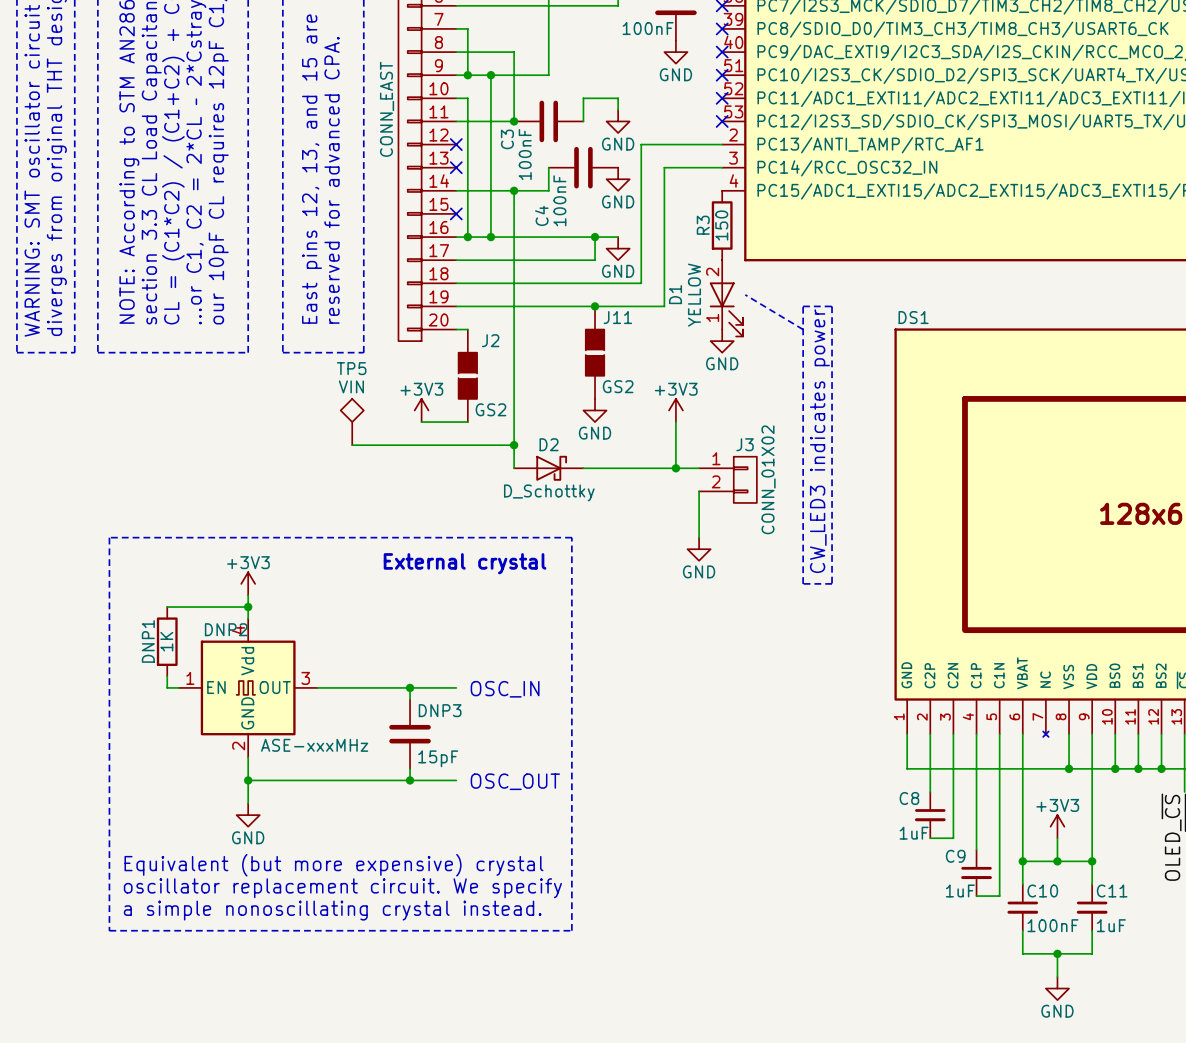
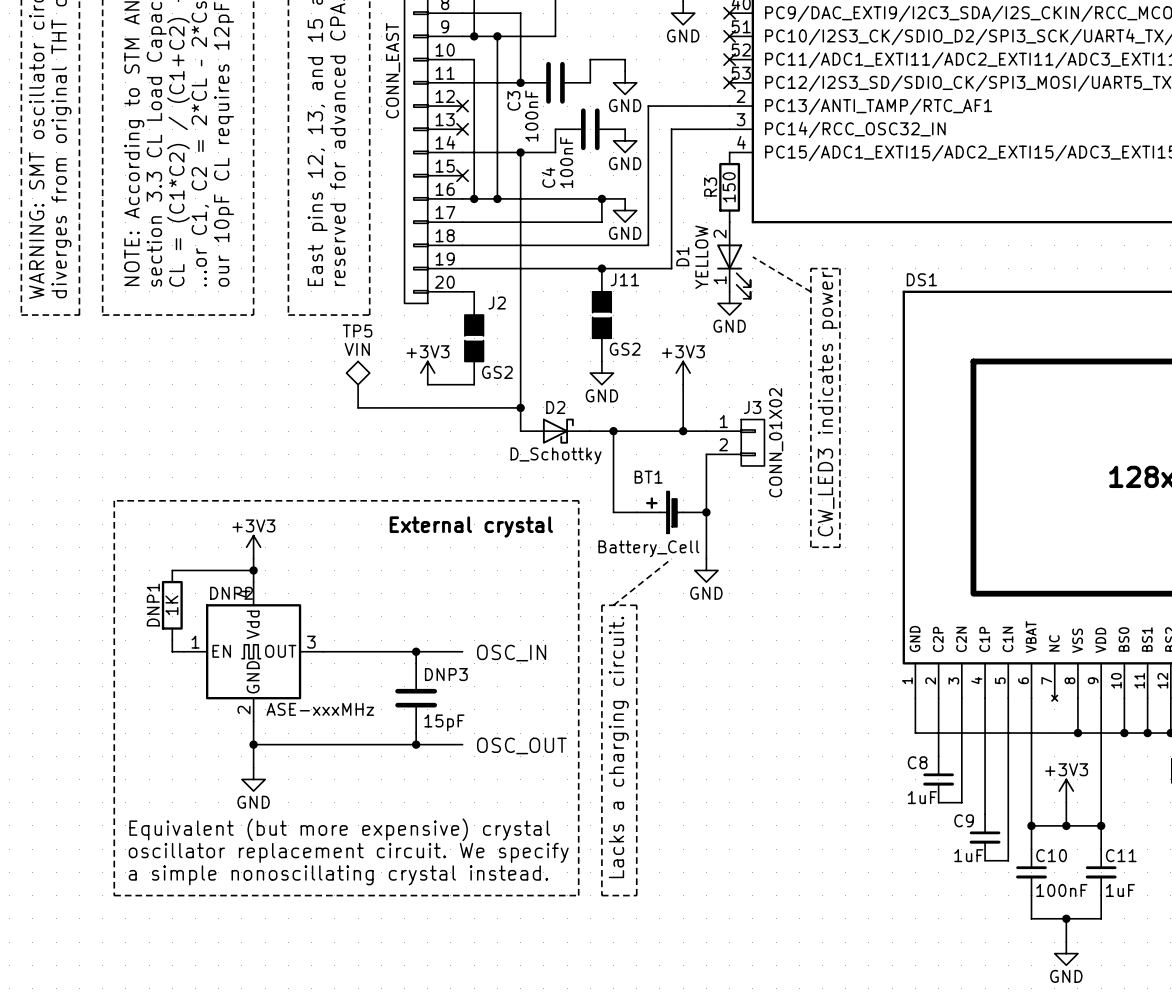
wire: none -> (613, 431) (613, 512) (636, 512)
junction: none -> (613, 431)
wire: none -> (706, 500) (706, 558)
BT1: none -> Battery_Cell (671, 512)
power symbol position: GND (699, 549) -> GND (706, 570)
junction: none -> (706, 512)
line: none -> (671, 558) (613, 605)
line: none -> (601, 605) (636, 605) (636, 895) (601, 895) (601, 605)
text: none -> Lacks a charging circuit. (618, 747)

